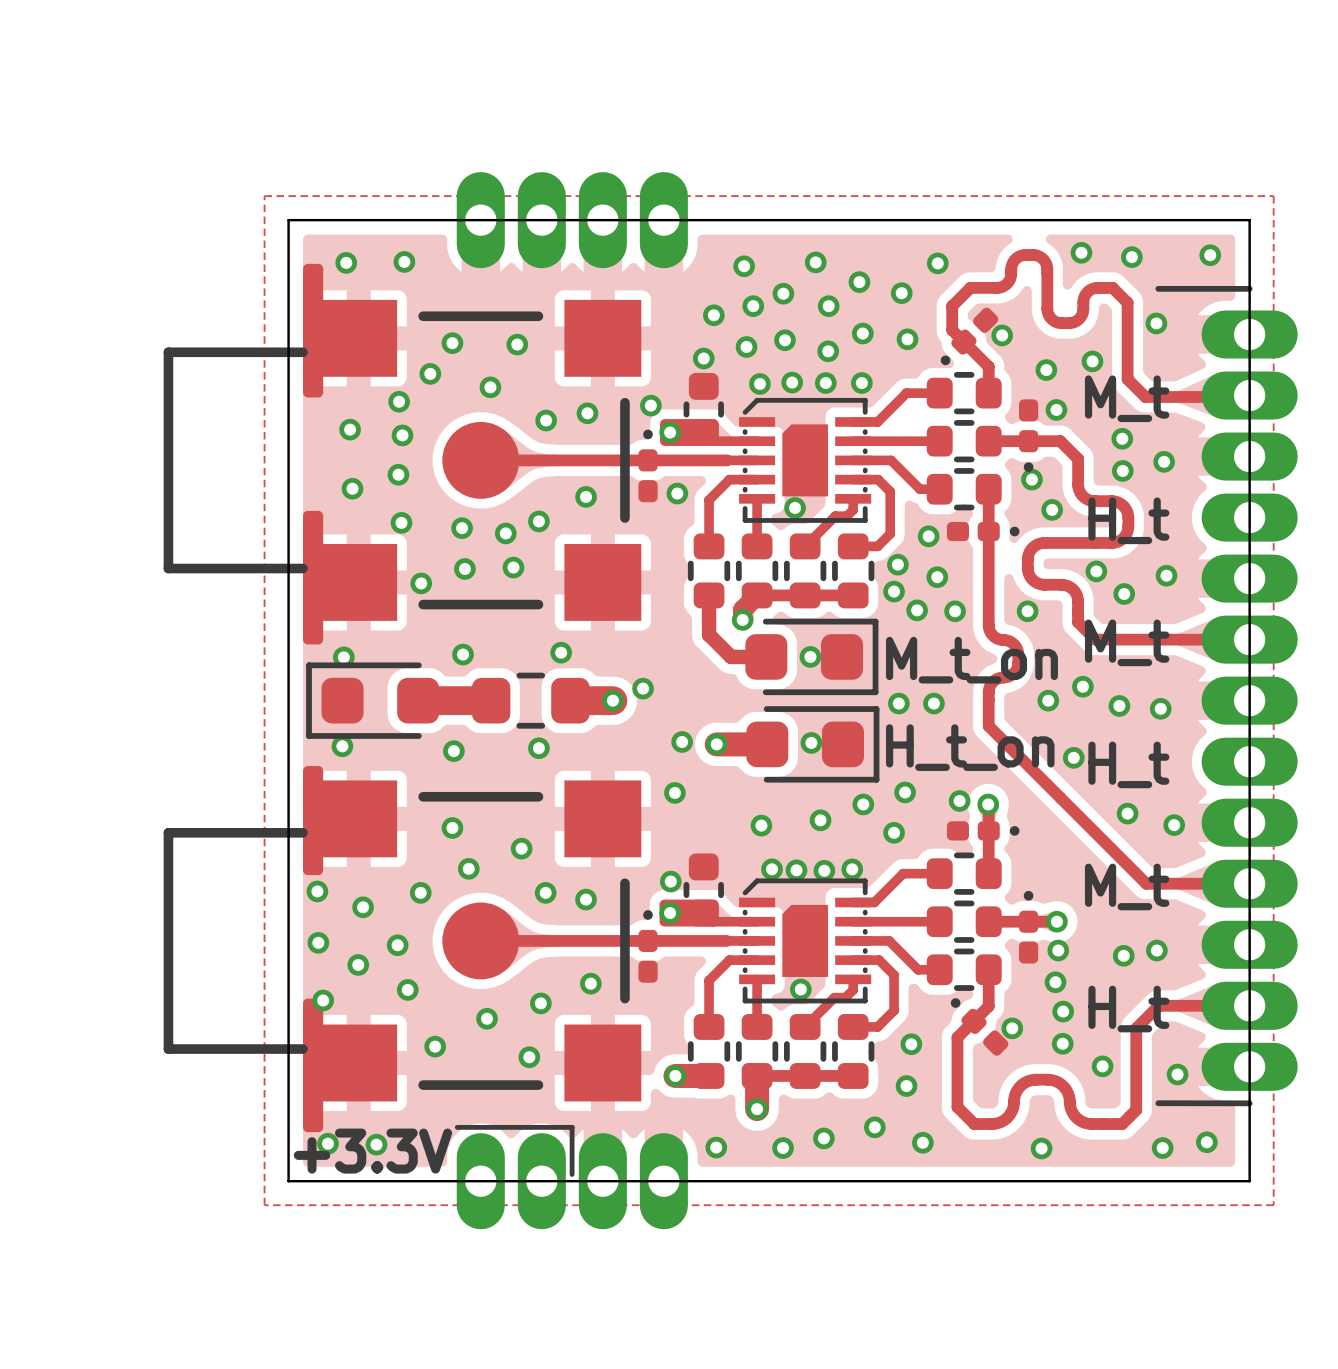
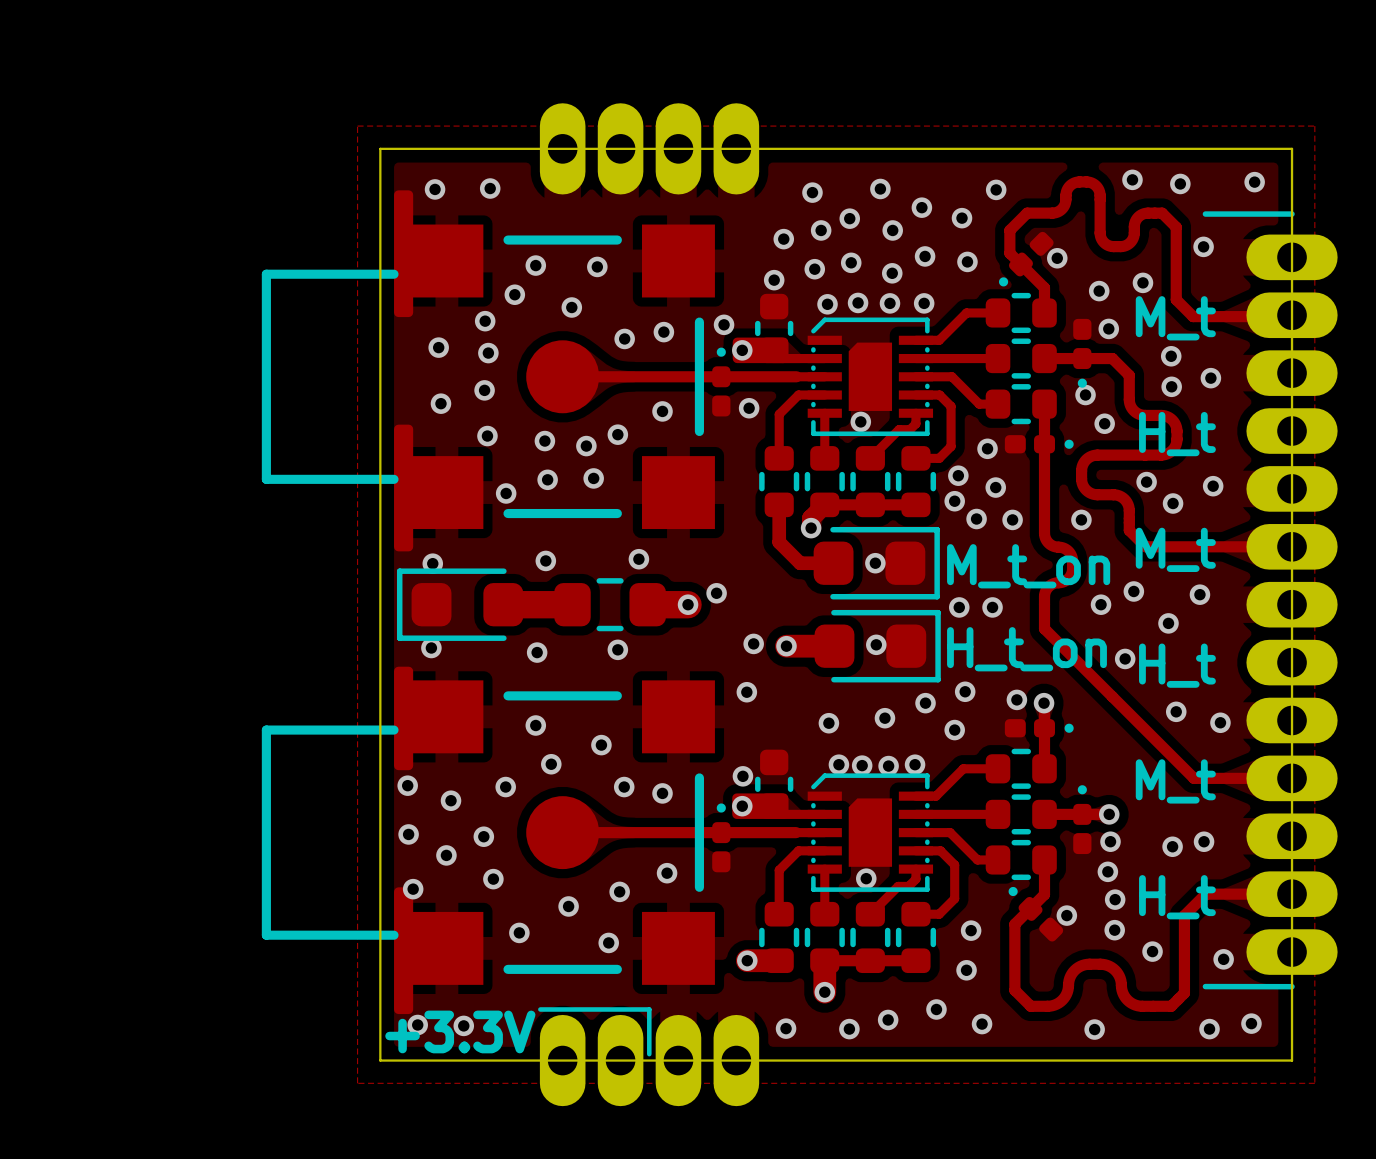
via position: (1119, 705) -> (1168, 623)
via position: (1160, 708) -> (1199, 594)

